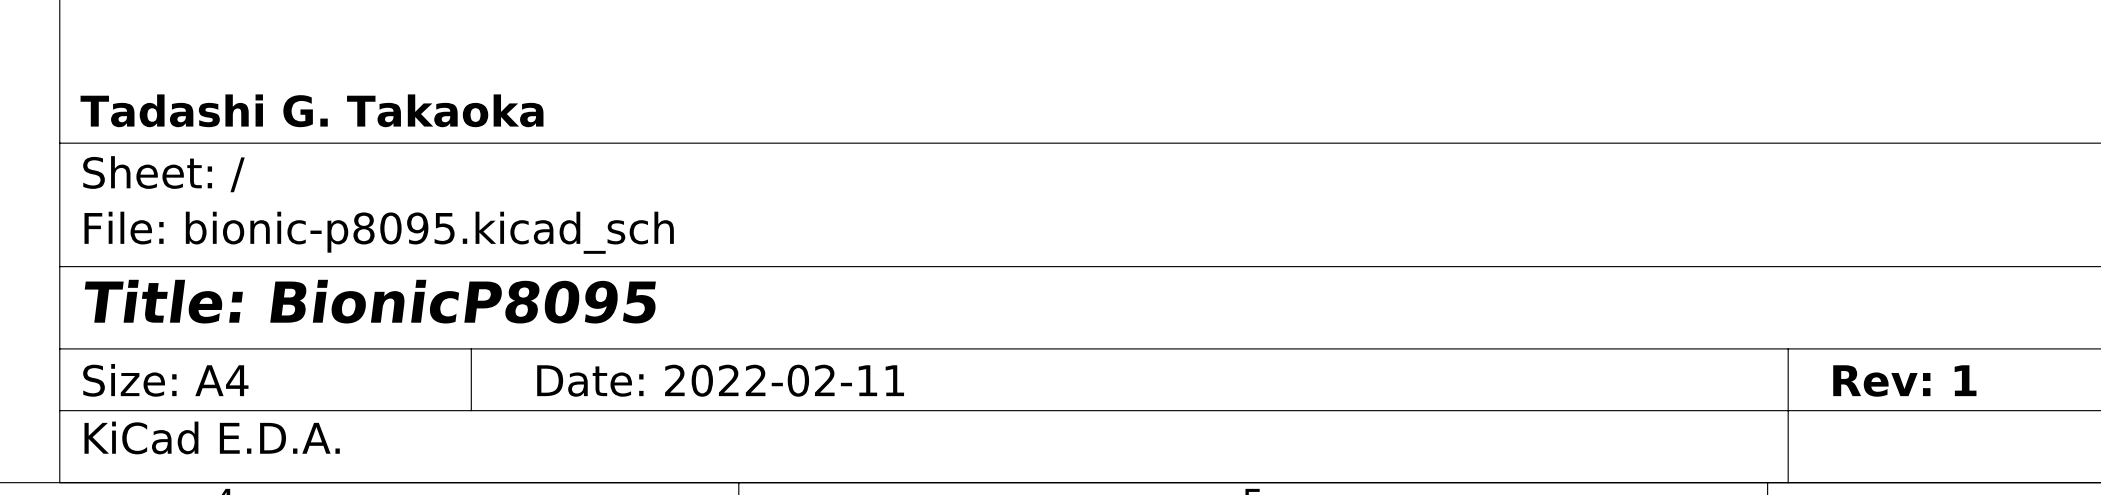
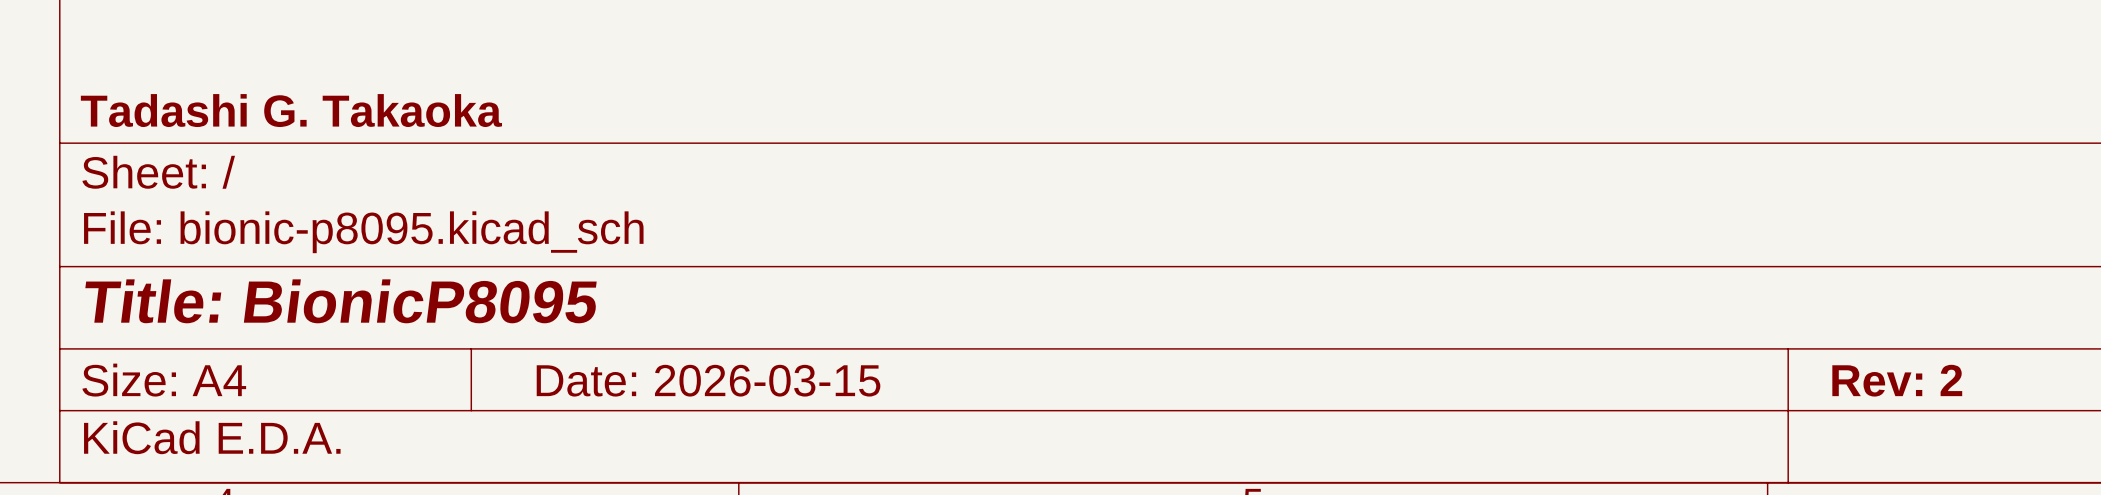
title block: Date: 2022-02-11 (720, 380) -> Date: 2026-03-15 (708, 380)
title block: Rev: 1 (1904, 381) -> Rev: 2 (1897, 380)

